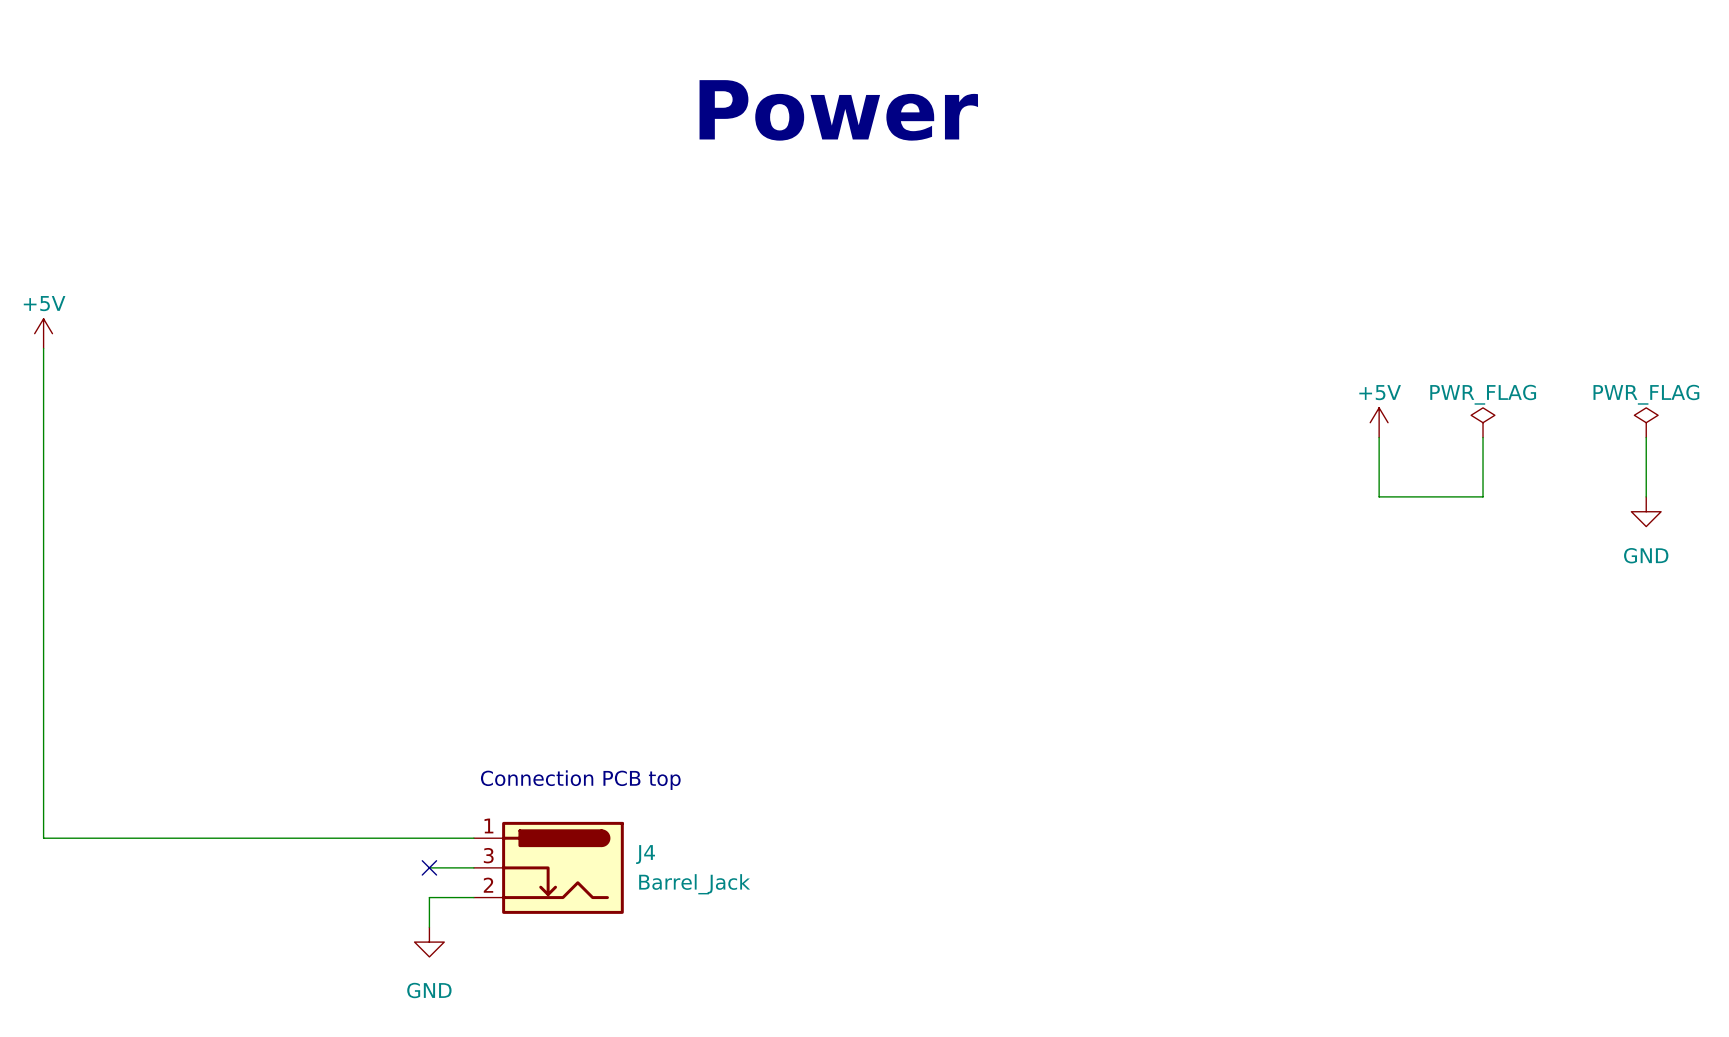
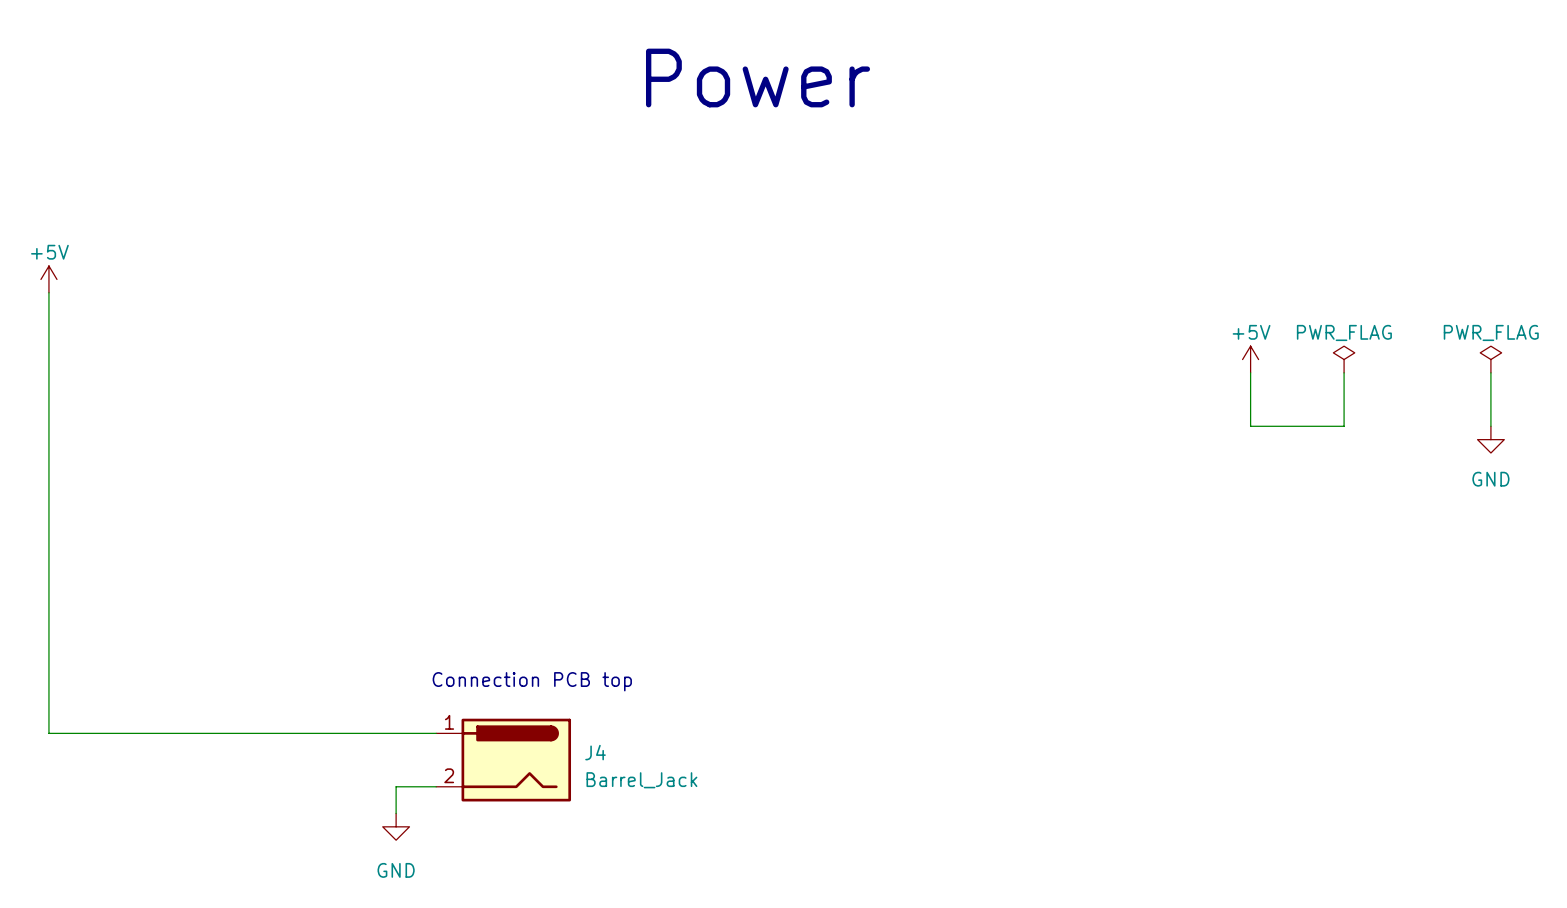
J4 symbol: [473, 821, 624, 914] -> [436, 718, 572, 802]
wire: (429, 867) (473, 867) -> none
no-connect mark: (429, 867) -> none

